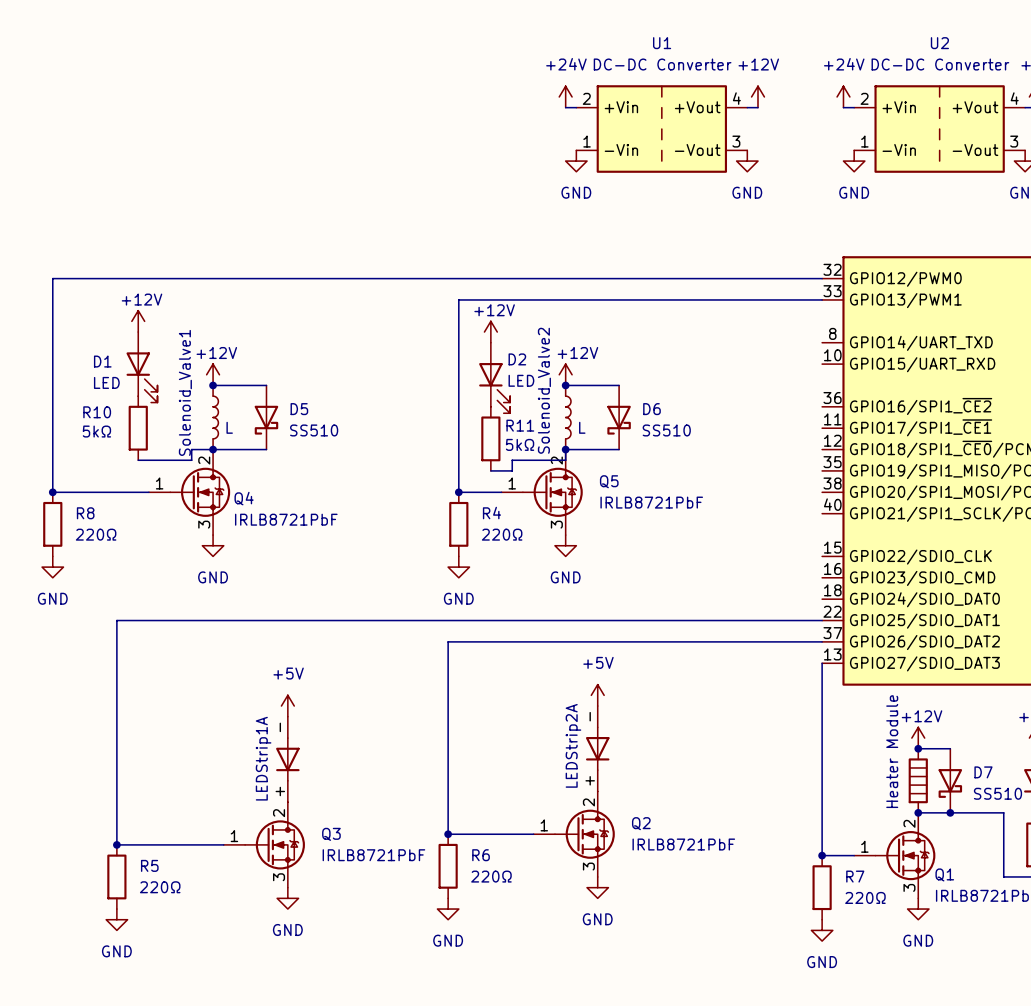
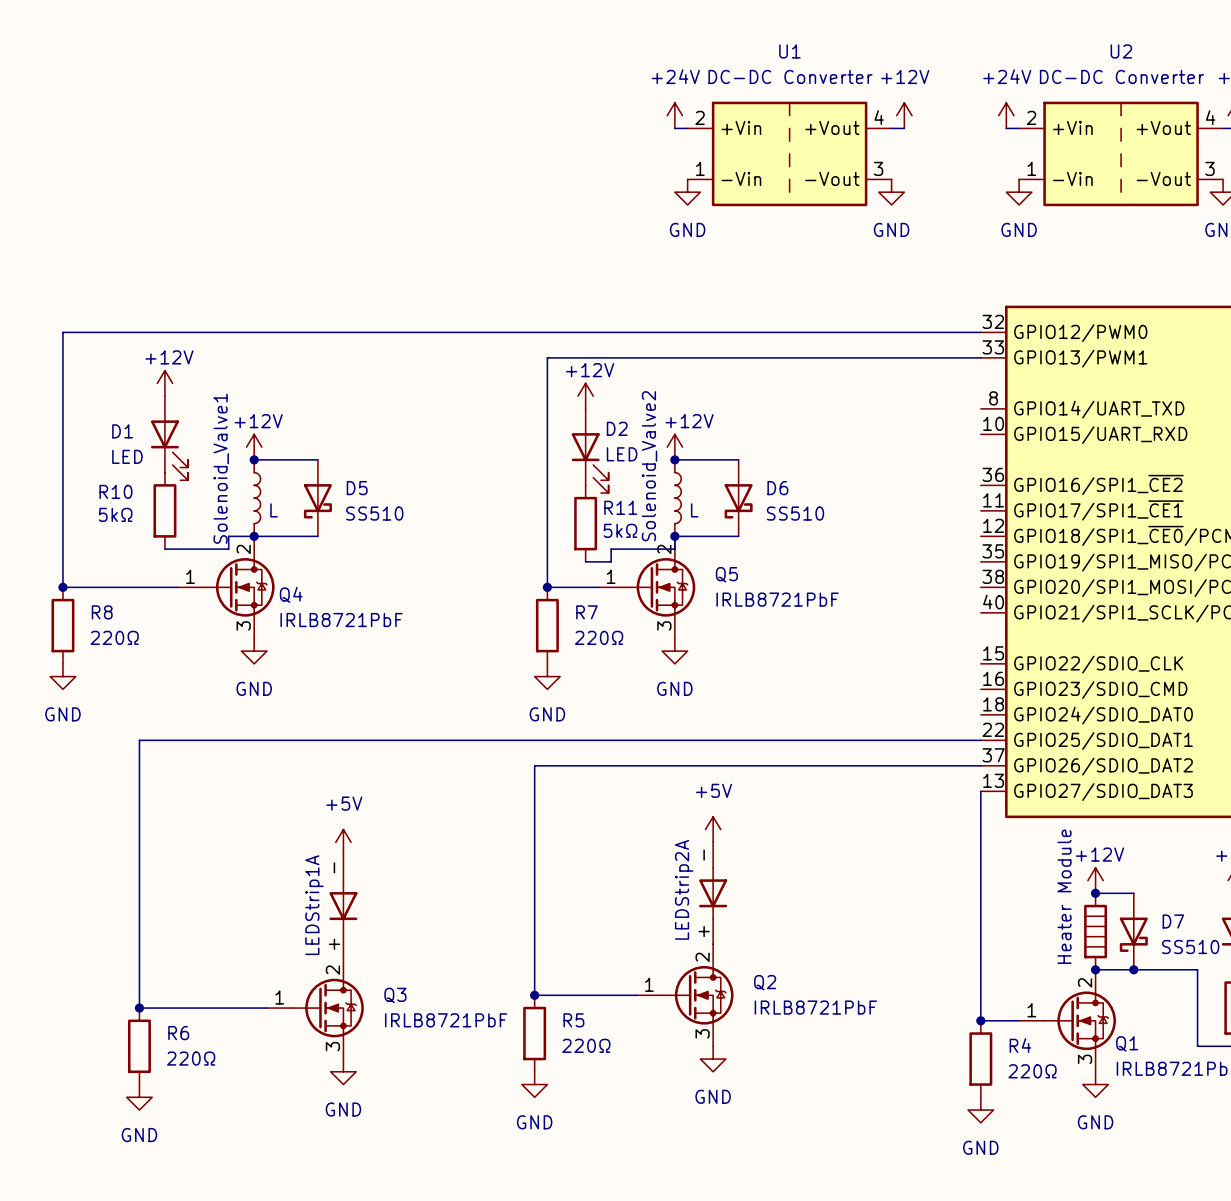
R4 name: R4 (491, 513) -> R7 (586, 612)
R6 name: R6 (481, 855) -> R5 (573, 1020)
R5 name: R5 (149, 865) -> R6 (178, 1033)
R7 name: R7 (855, 876) -> R4 (1020, 1045)

